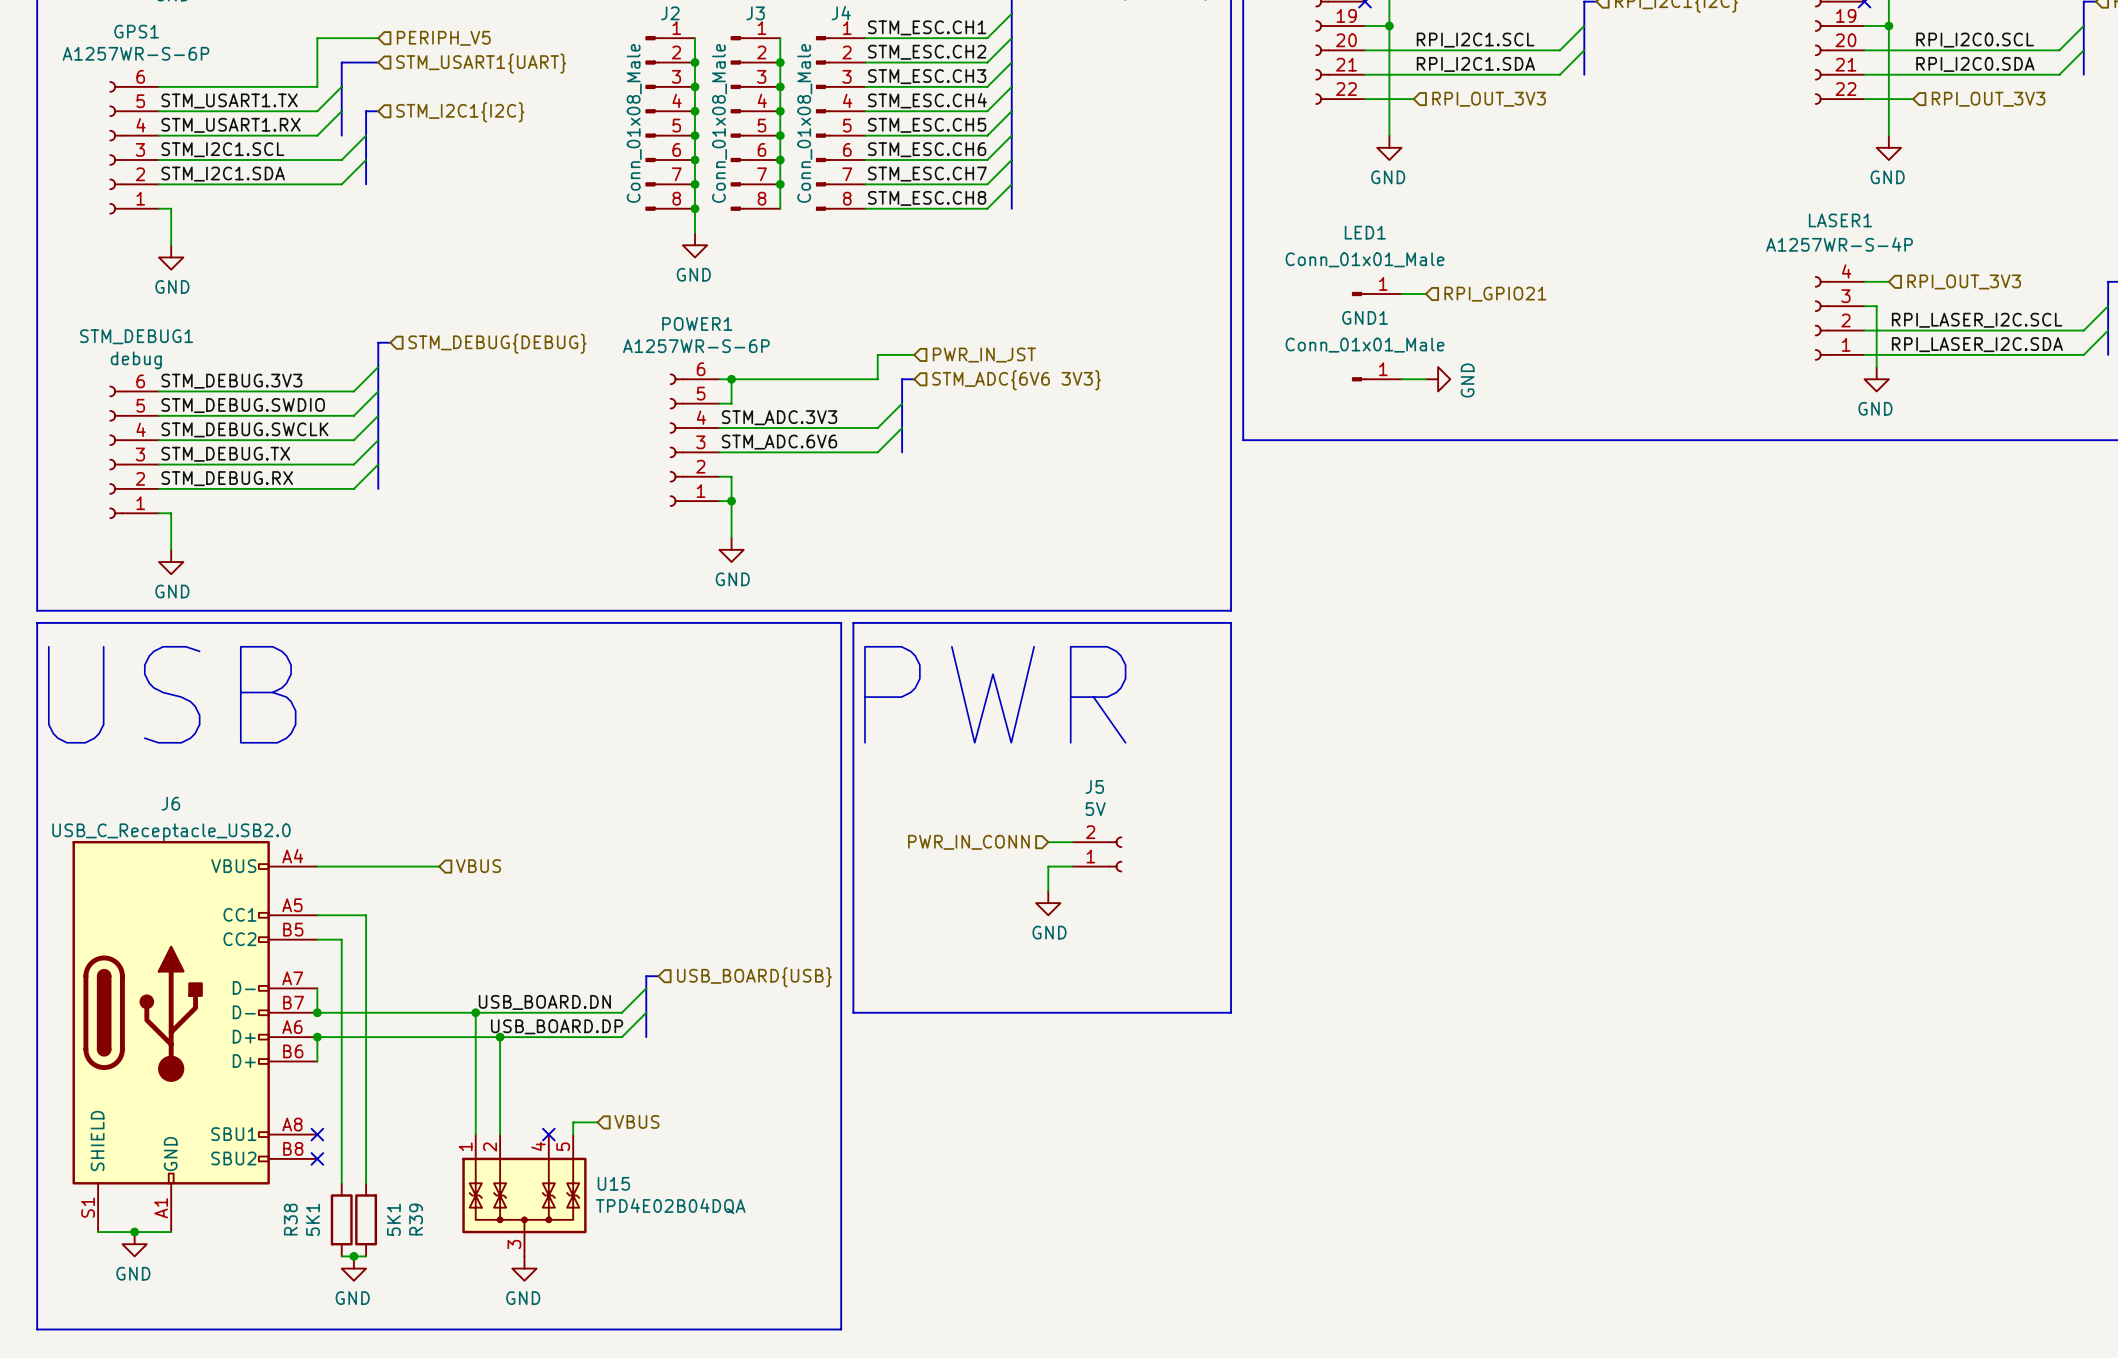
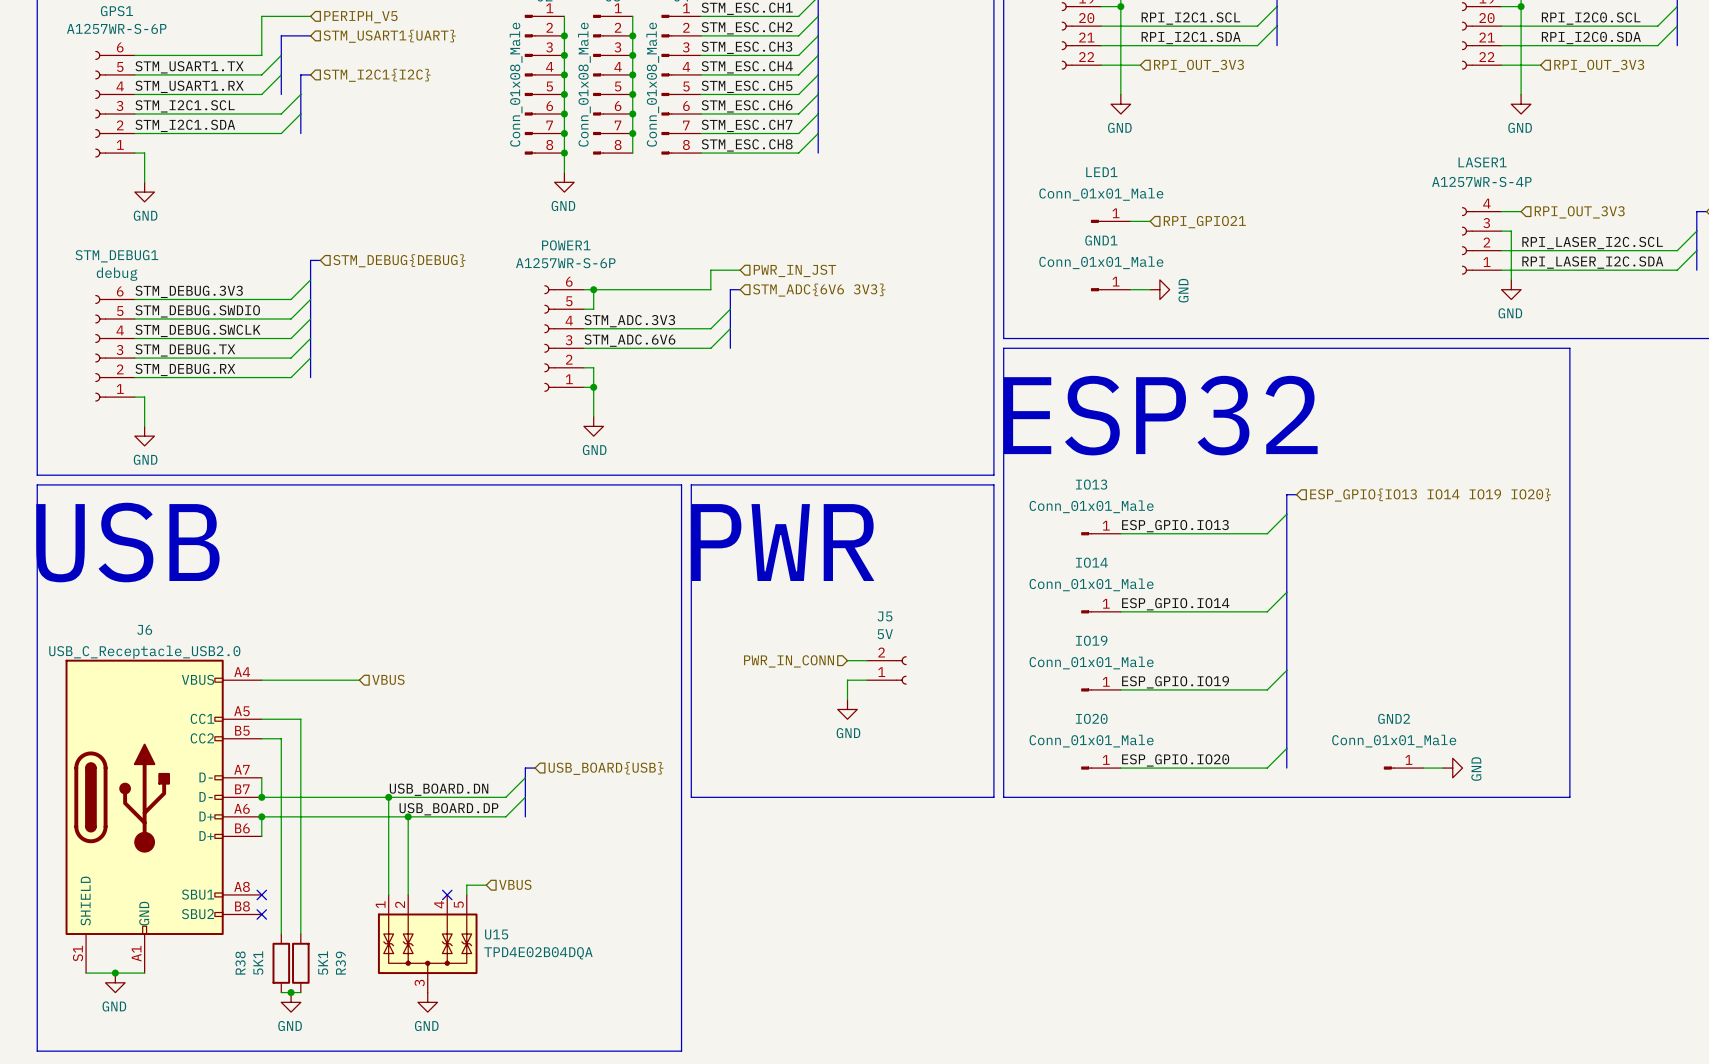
line: none -> (1003, 348) (1003, 797) (1569, 797) (1569, 348) (1003, 348)
text: none -> ESP32 (1160, 415)
bus: none -> (1296, 494) (1286, 494) (1286, 768)
hierarchical label: none -> ESP_GPIO{IO13 IO14 IO19 IO20} (1430, 495)
wire: none -> (1286, 514) (1267, 533) (1120, 533)
label: none -> ESP_GPIO.IO13 (1175, 526)
IO13: none -> Conn_01x01_Male (1101, 533)
wire: none -> (1286, 592) (1267, 611) (1120, 611)
label: none -> ESP_GPIO.IO14 (1175, 604)
IO14: none -> Conn_01x01_Male (1101, 611)
wire: none -> (1286, 670) (1267, 689) (1120, 689)
label: none -> ESP_GPIO.IO19 (1175, 682)
IO19: none -> Conn_01x01_Male (1101, 689)
wire: none -> (1286, 748) (1267, 768) (1120, 768)
label: none -> ESP_GPIO.IO20 (1175, 760)
IO20: none -> Conn_01x01_Male (1101, 768)
GND2: none -> Conn_01x01_Male (1403, 768)
wire: none -> (1423, 768) (1442, 768)
power symbol: none -> GND (1452, 768)

